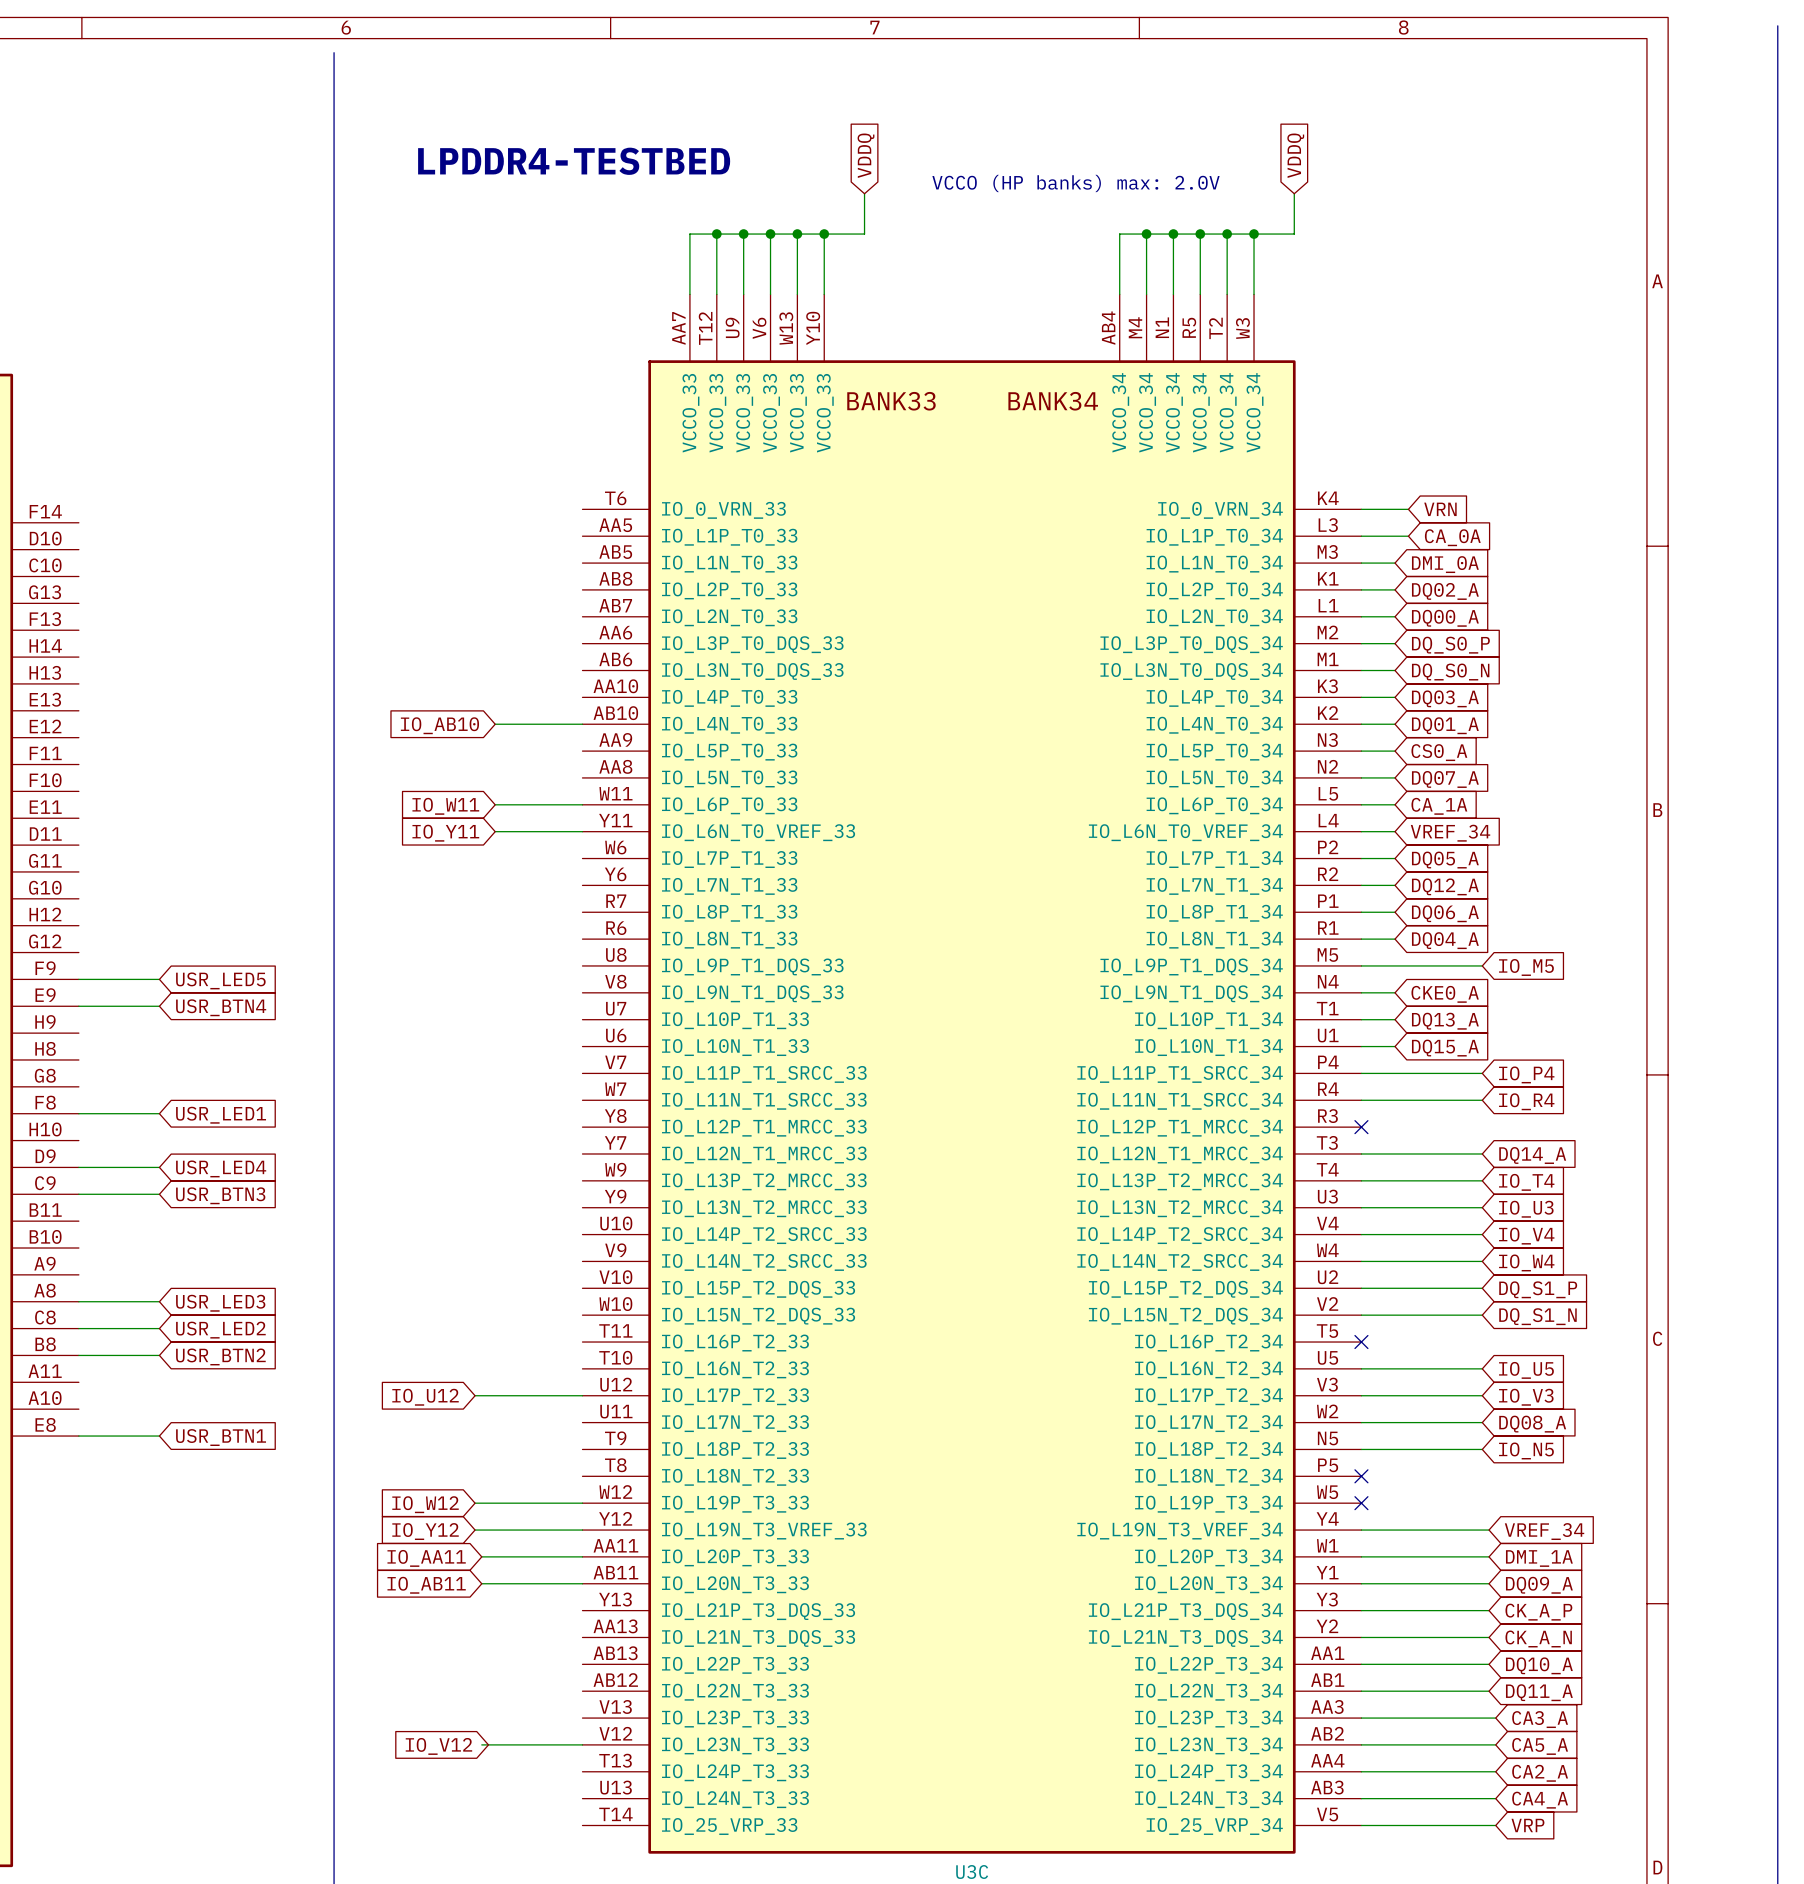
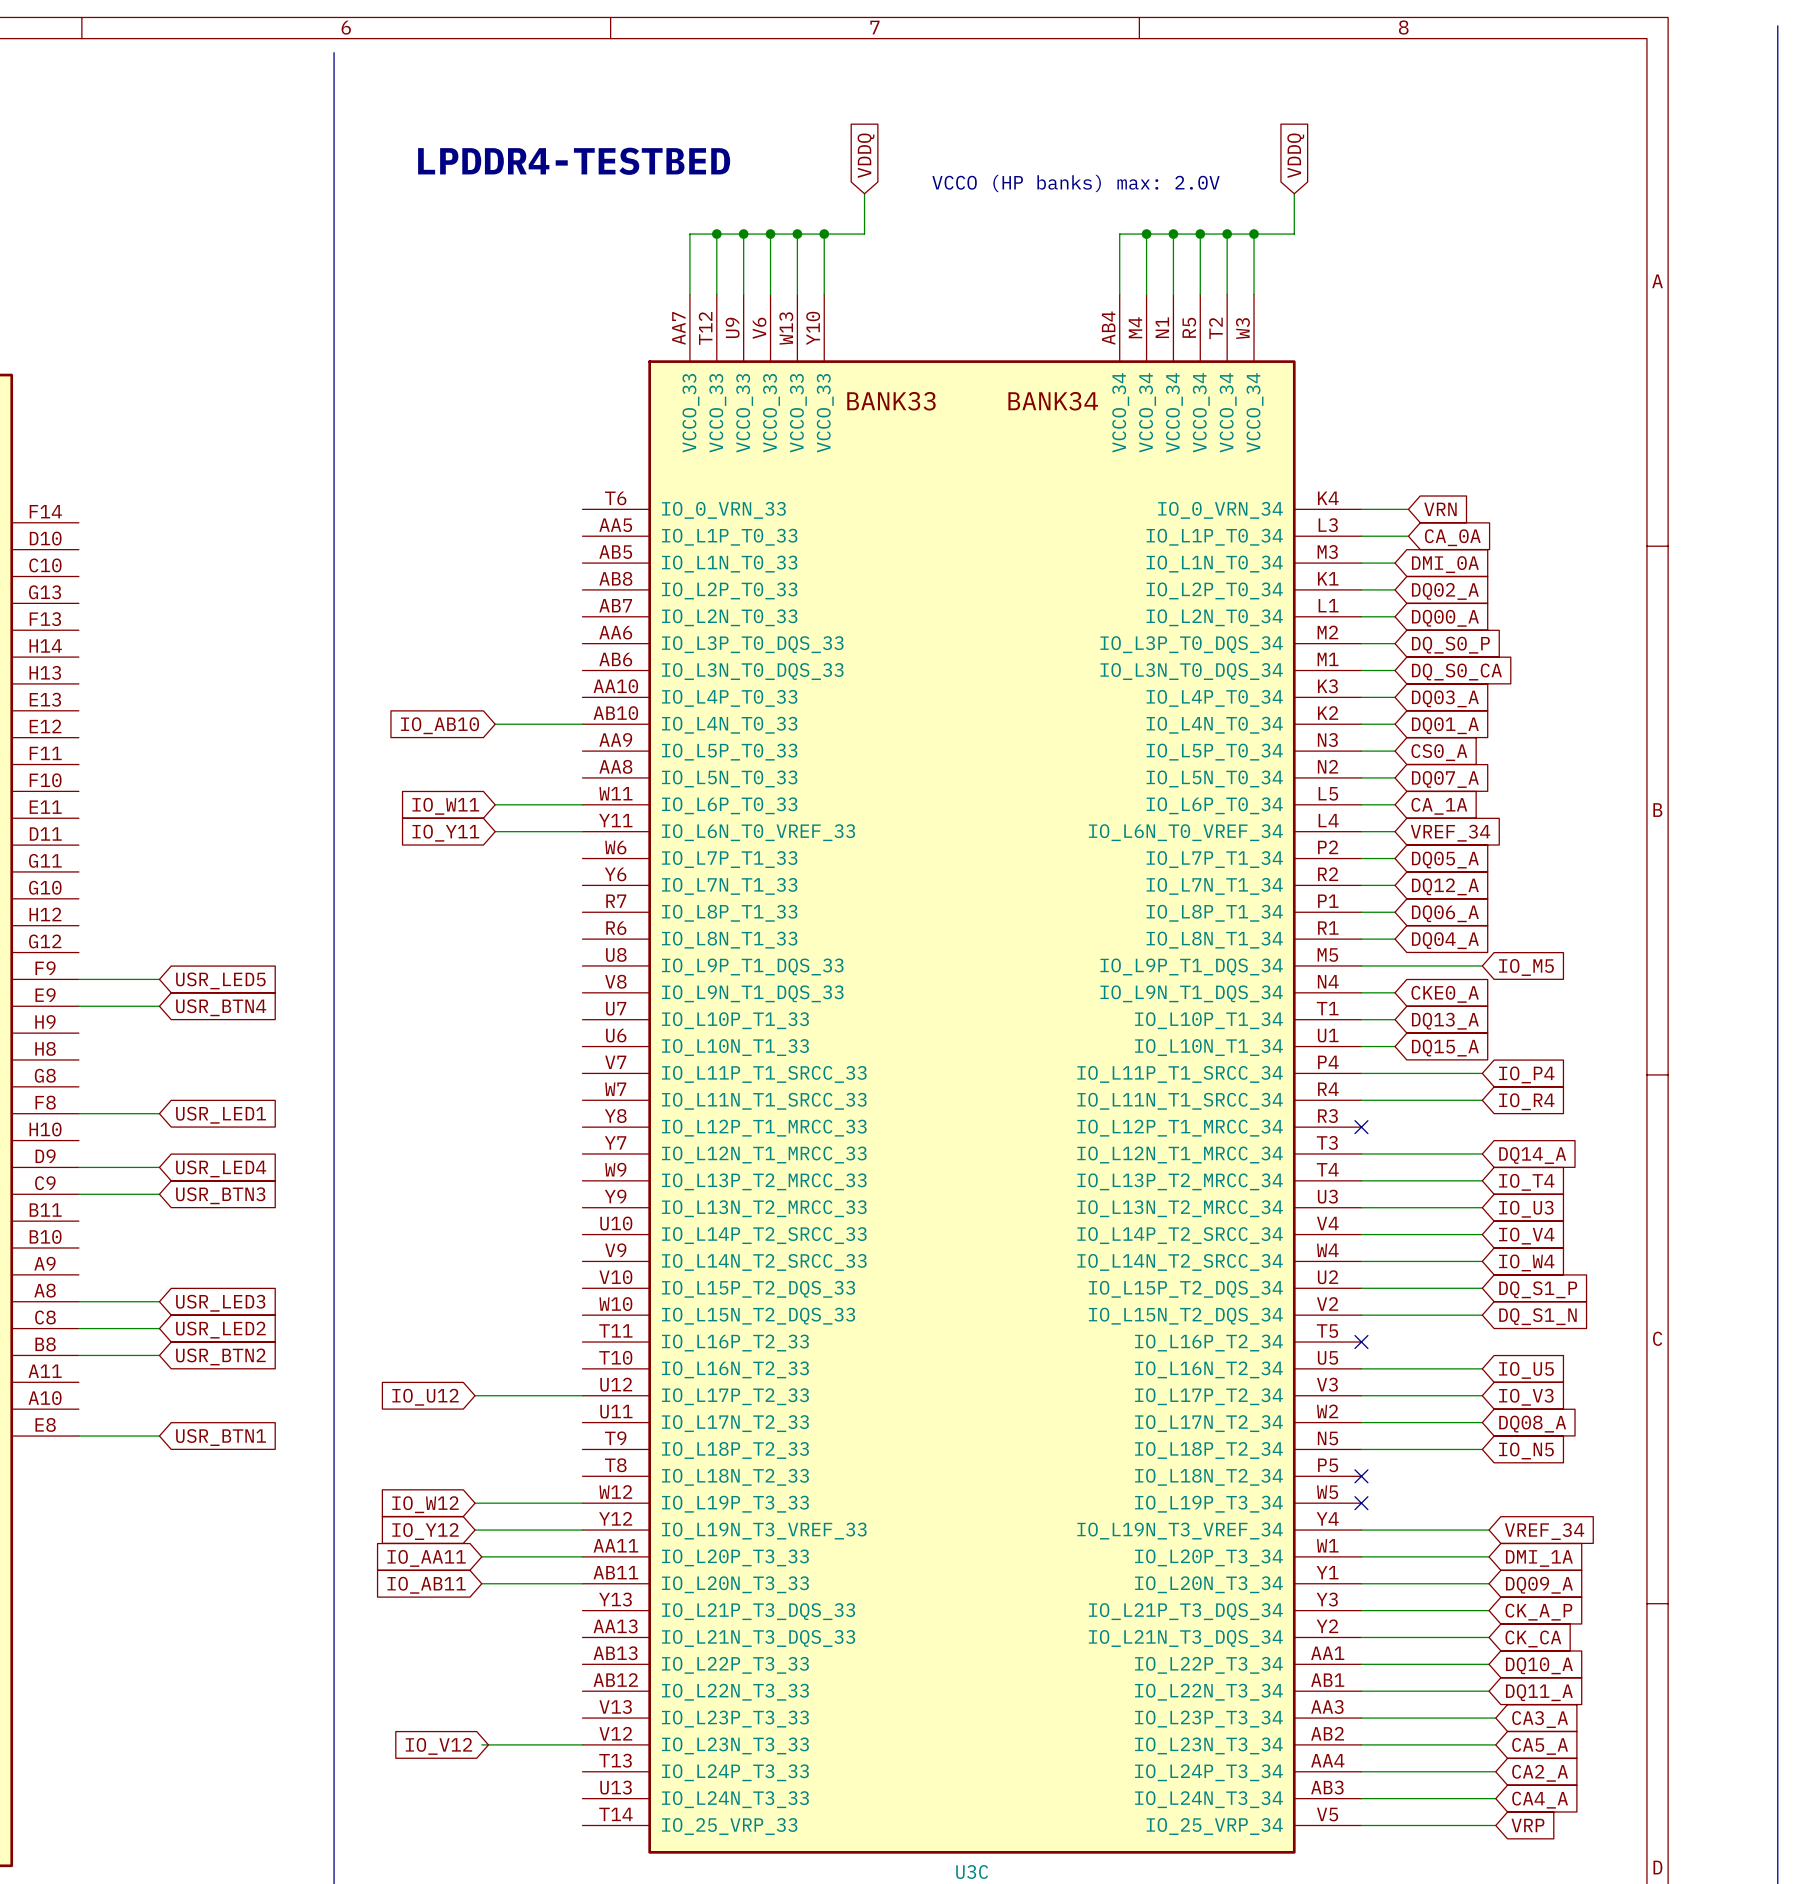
global label: DQ_S0_N (1450, 672) -> DQ_S0_CA (1456, 672)
global label: CK_A_N (1538, 1638) -> CK_CA (1533, 1638)

